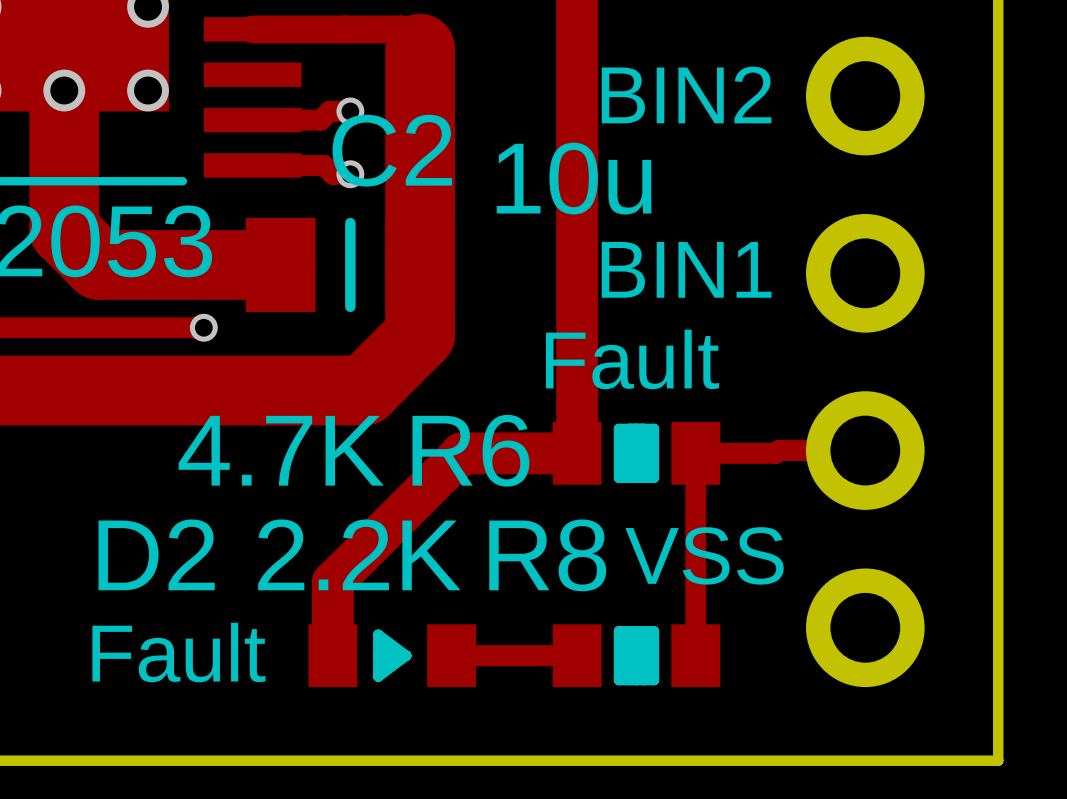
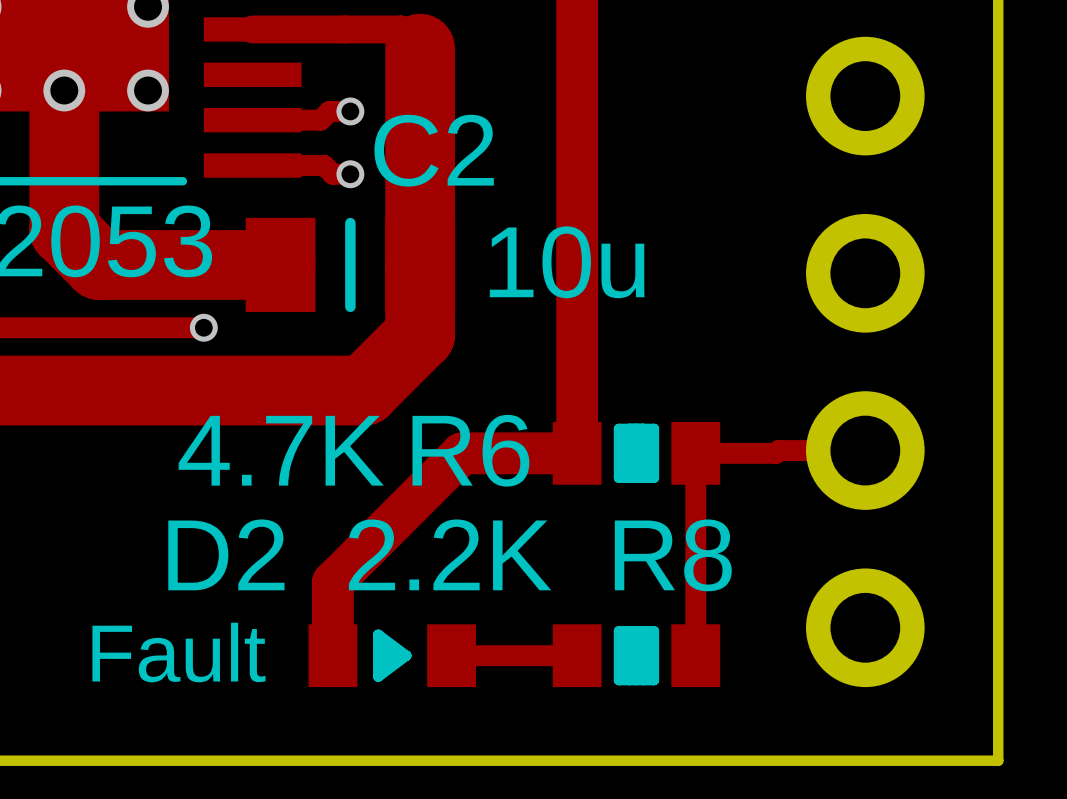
text: BIN2 (686, 94) -> none
C2 name position: C2 (392, 150) -> C2 (434, 150)
C2 value position: 10u (574, 178) -> 10u (567, 262)
text: BIN1 (686, 269) -> none
text: Fault (632, 359) -> none
D2 name position: D2 (156, 554) -> D2 (226, 554)
R8 value position: 2.2K (359, 554) -> 2.2K (450, 554)
R8 name position: R8 (547, 555) -> R8 (673, 555)
text: VSS (704, 555) -> none

